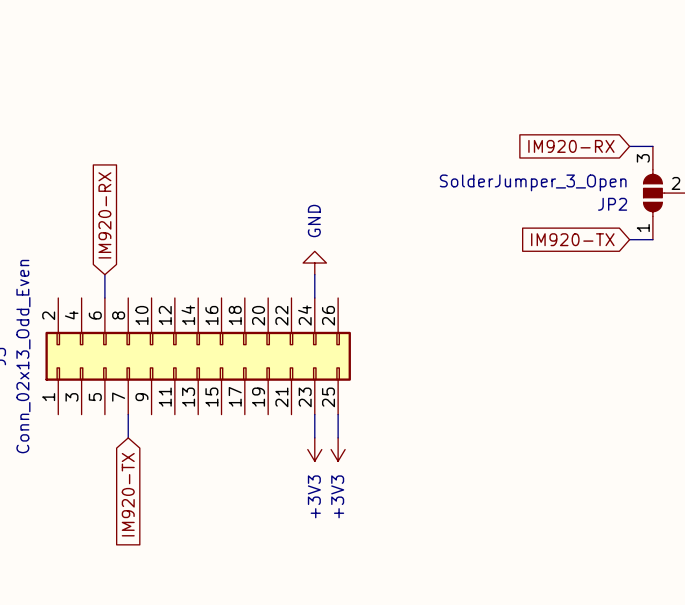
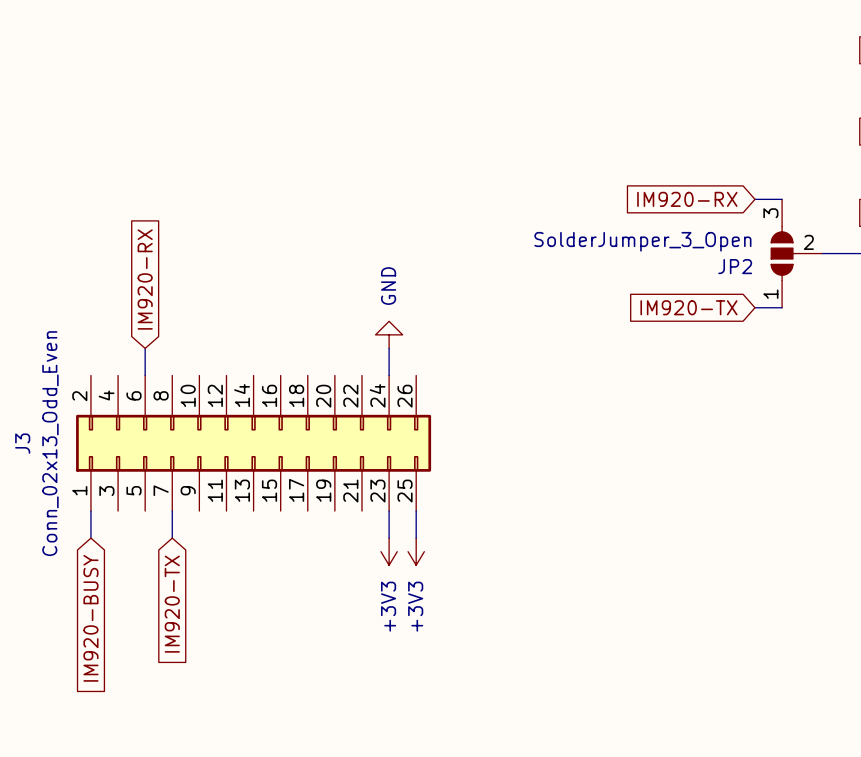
wire: none -> (90, 511) (90, 538)
global label: none -> IM920-BUSY (90, 618)

